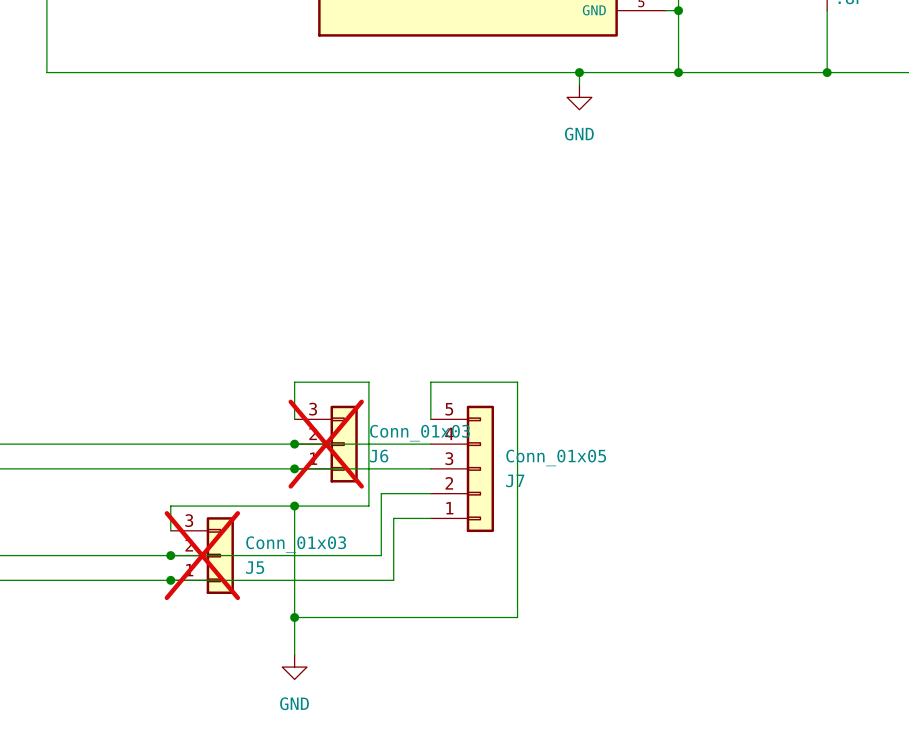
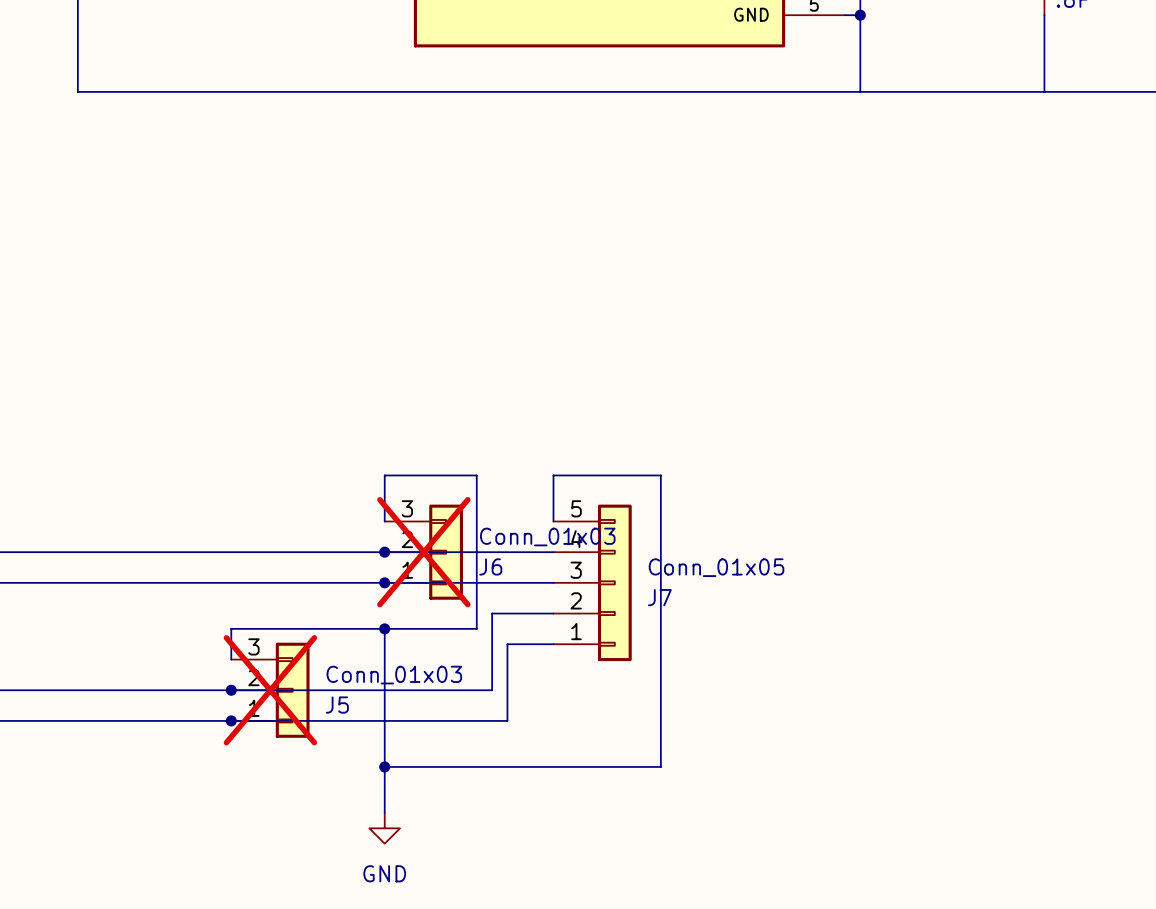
wire: (579, 72) (579, 84) -> none
junction: (579, 72) -> none
junction: (678, 72) -> none
junction: (827, 72) -> none
power symbol: GND (579, 97) -> none

